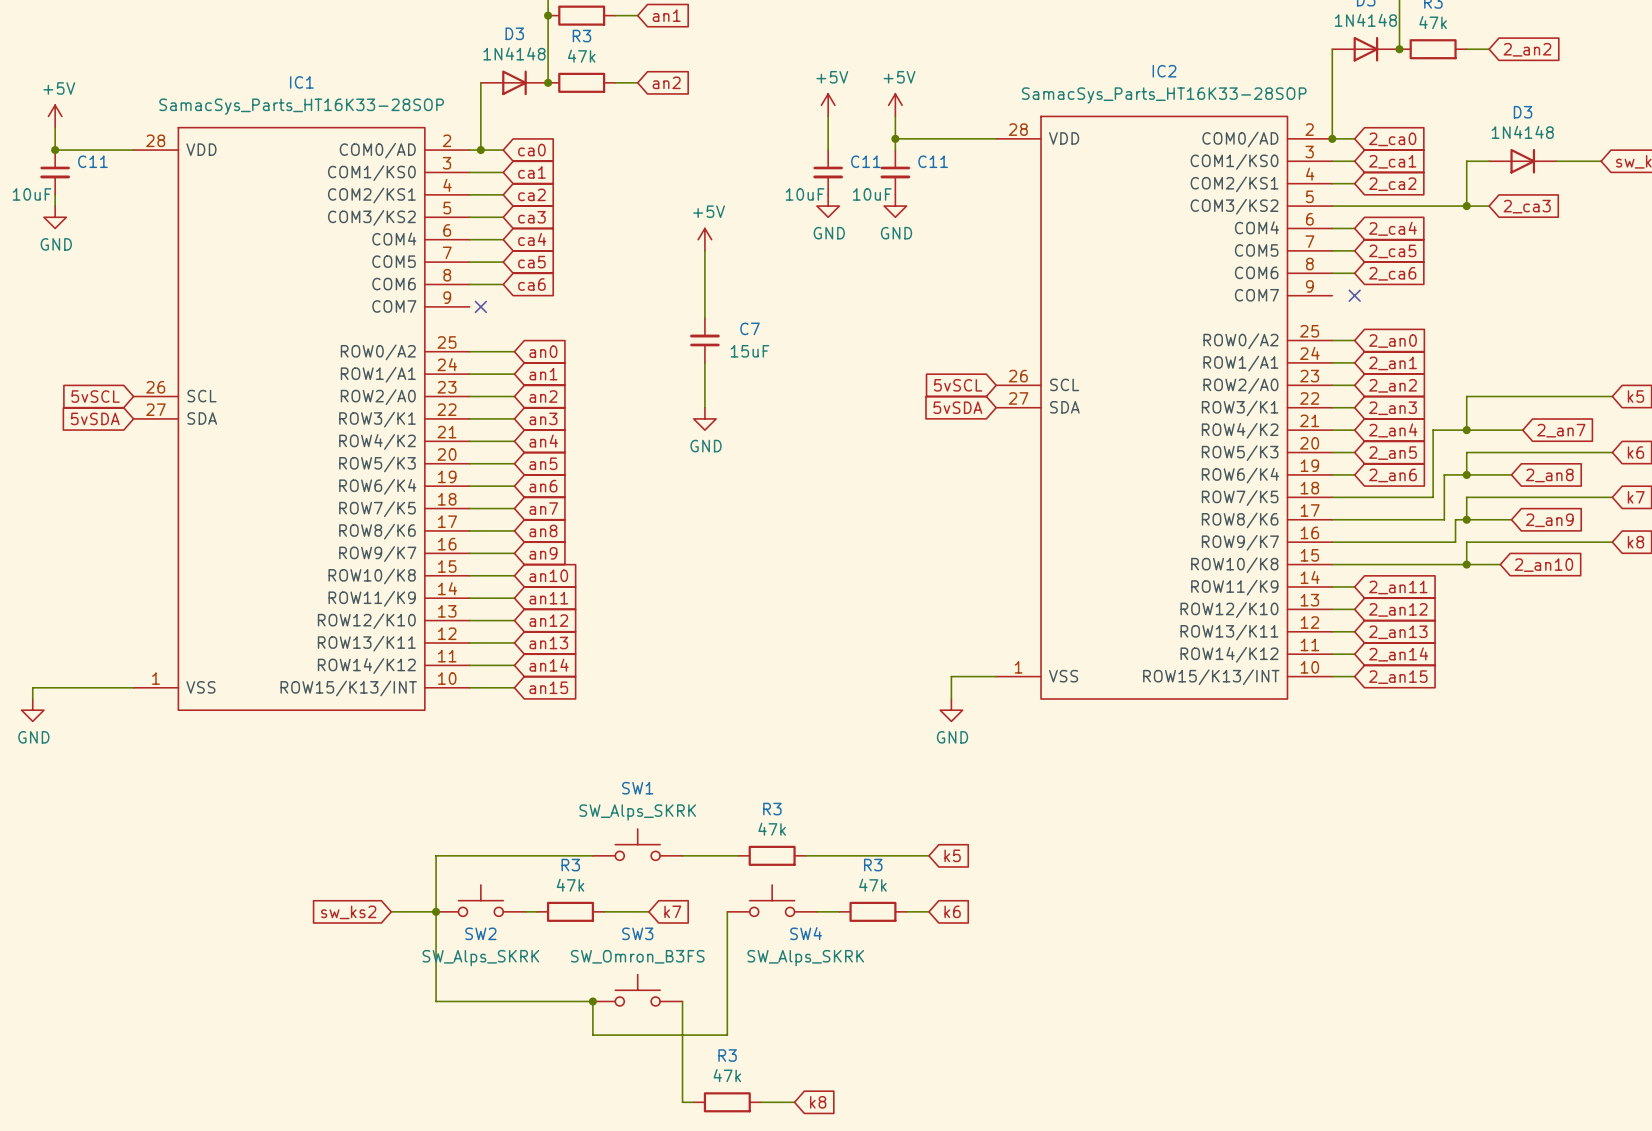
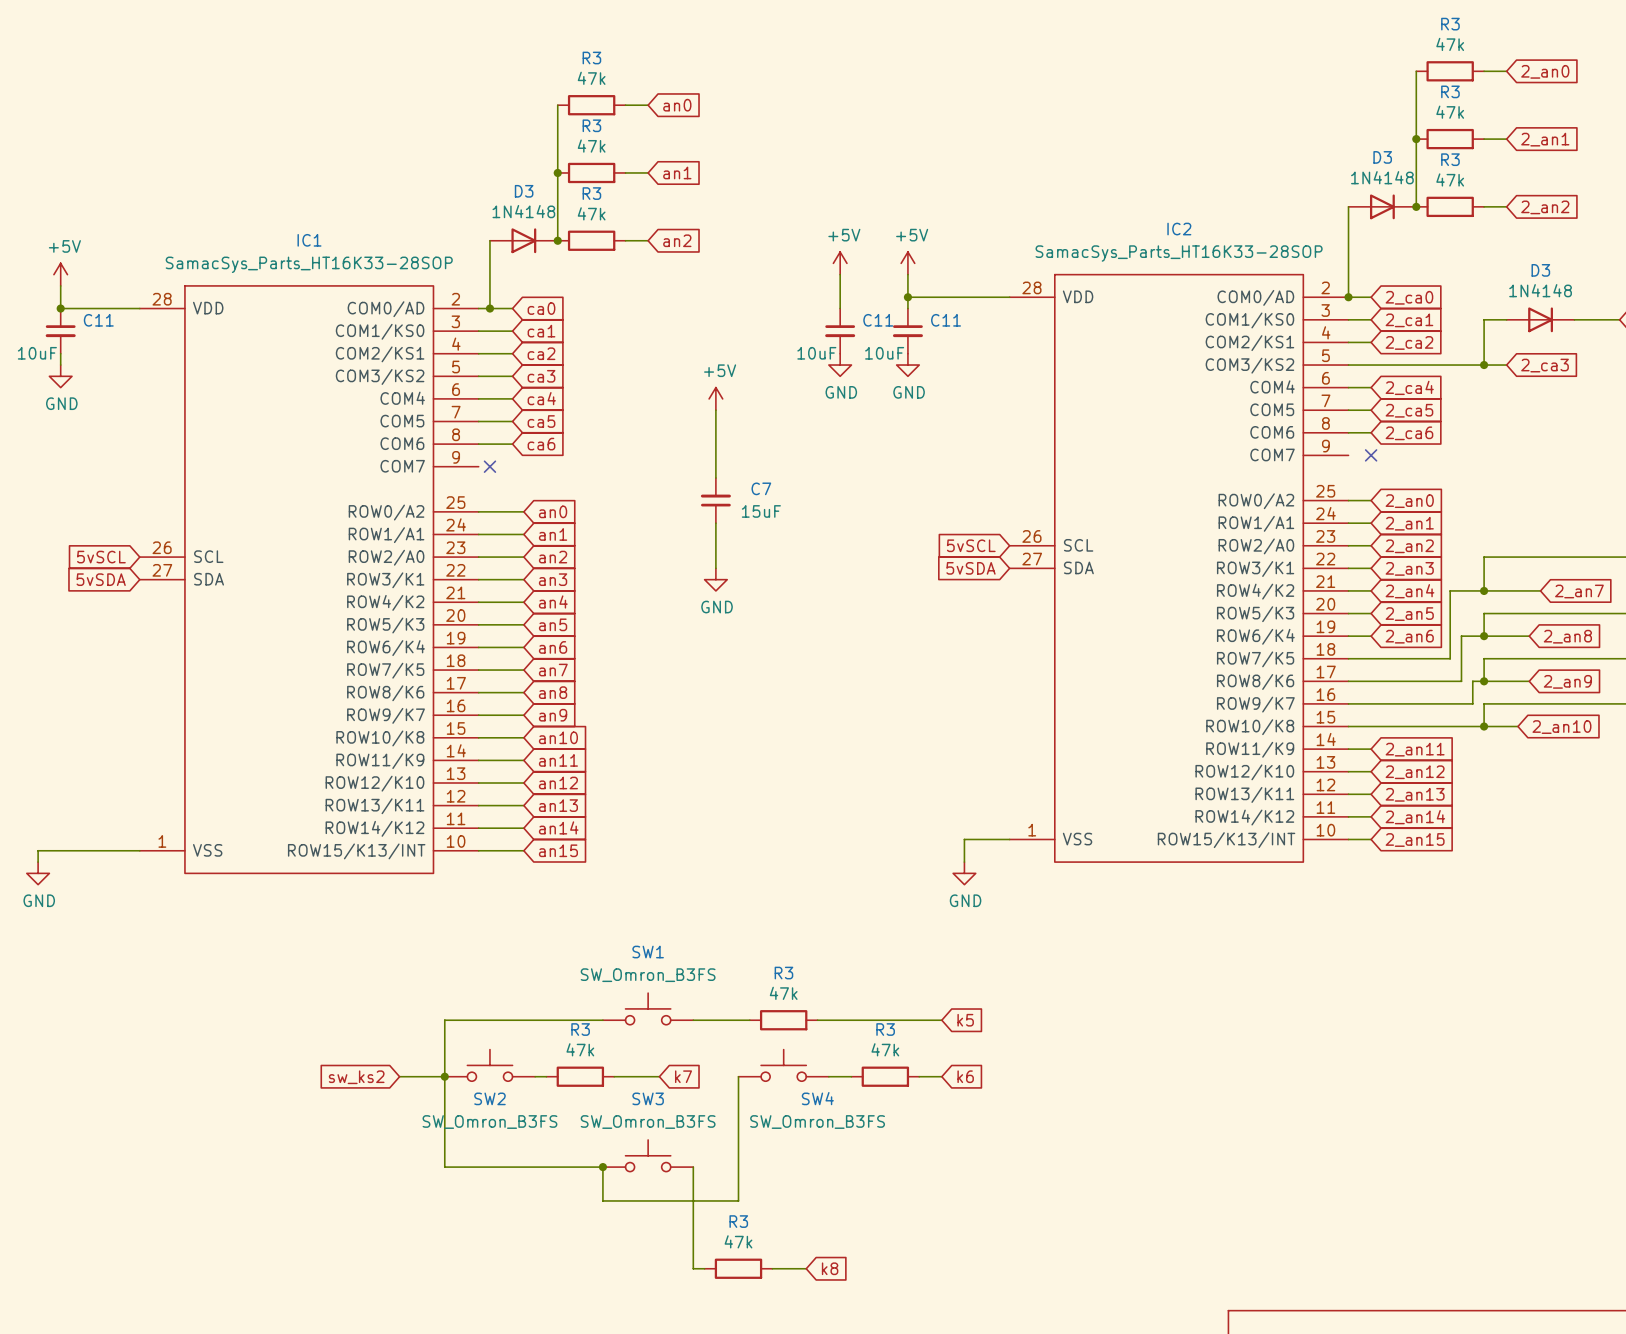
SW1 value: SW_Alps_SKRK (637, 812) -> SW_Omron_B3FS (648, 975)
SW2 value: SW_Alps_SKRK (480, 958) -> SW_Omron_B3FS (489, 1122)
SW4 value: SW_Alps_SKRK (805, 958) -> SW_Omron_B3FS (817, 1122)

